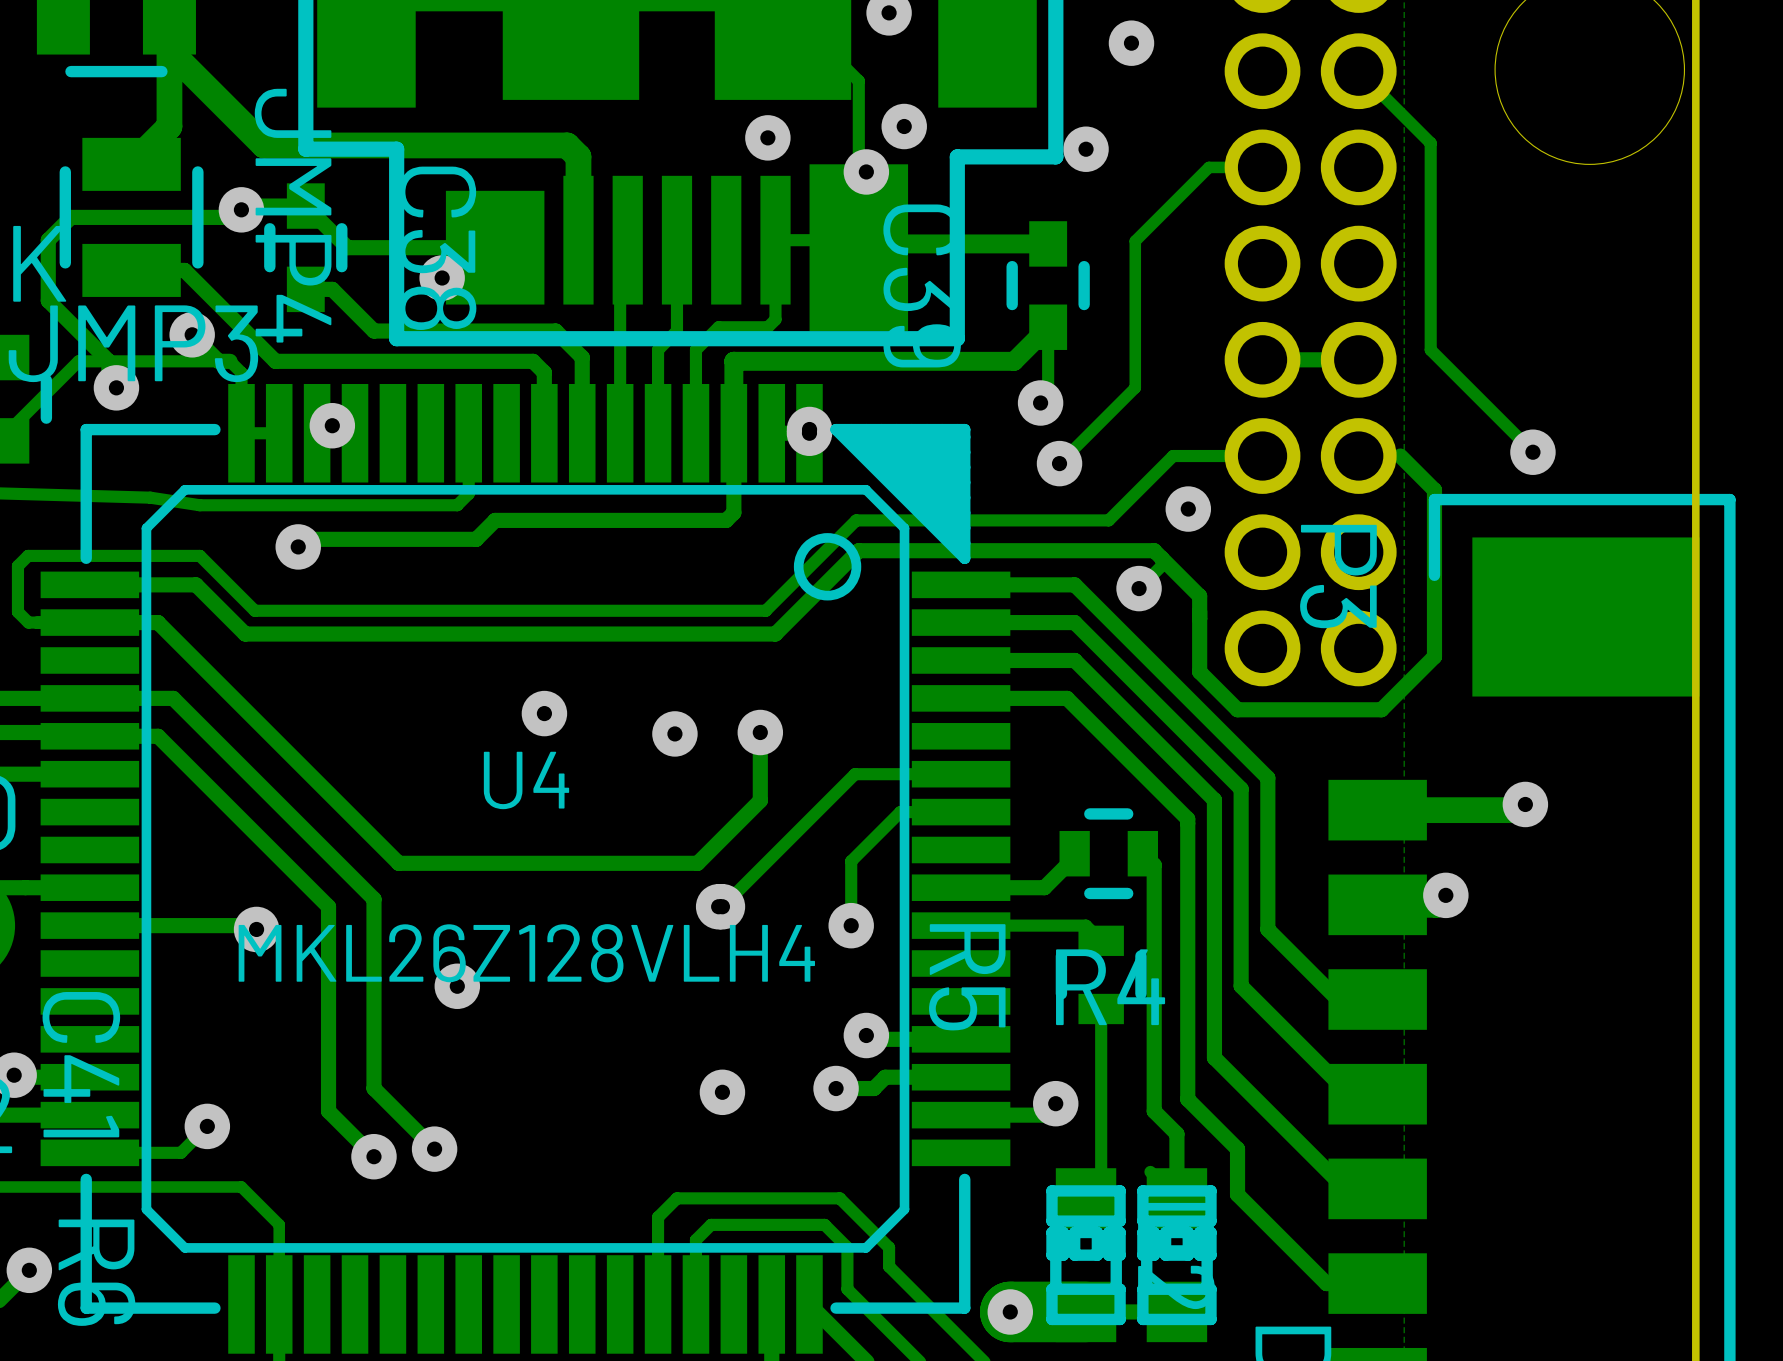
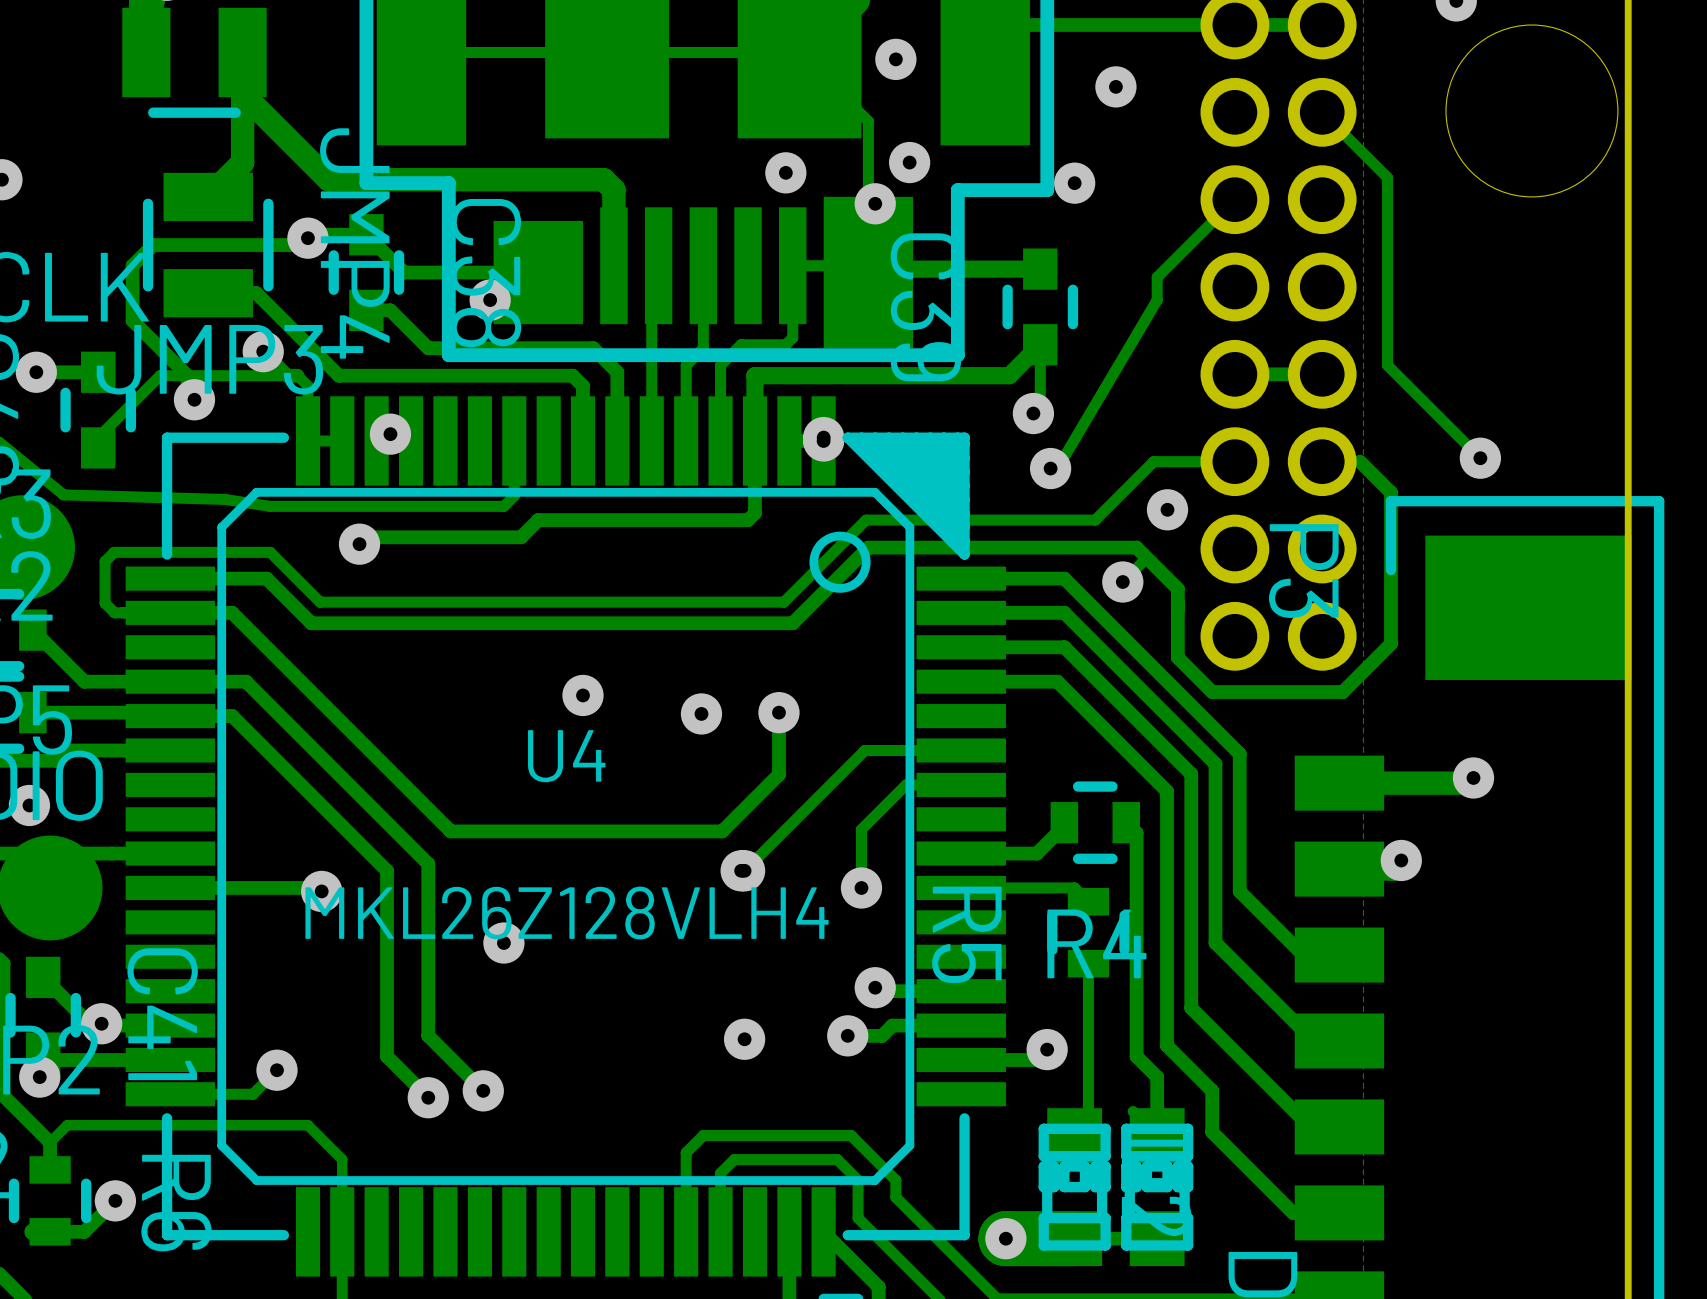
track: (1262, 167) (1208, 167) (1135, 241) (1135, 387) (1059, 463) -> (1234, 199) (1157, 277) (1157, 300) (1057, 468)

